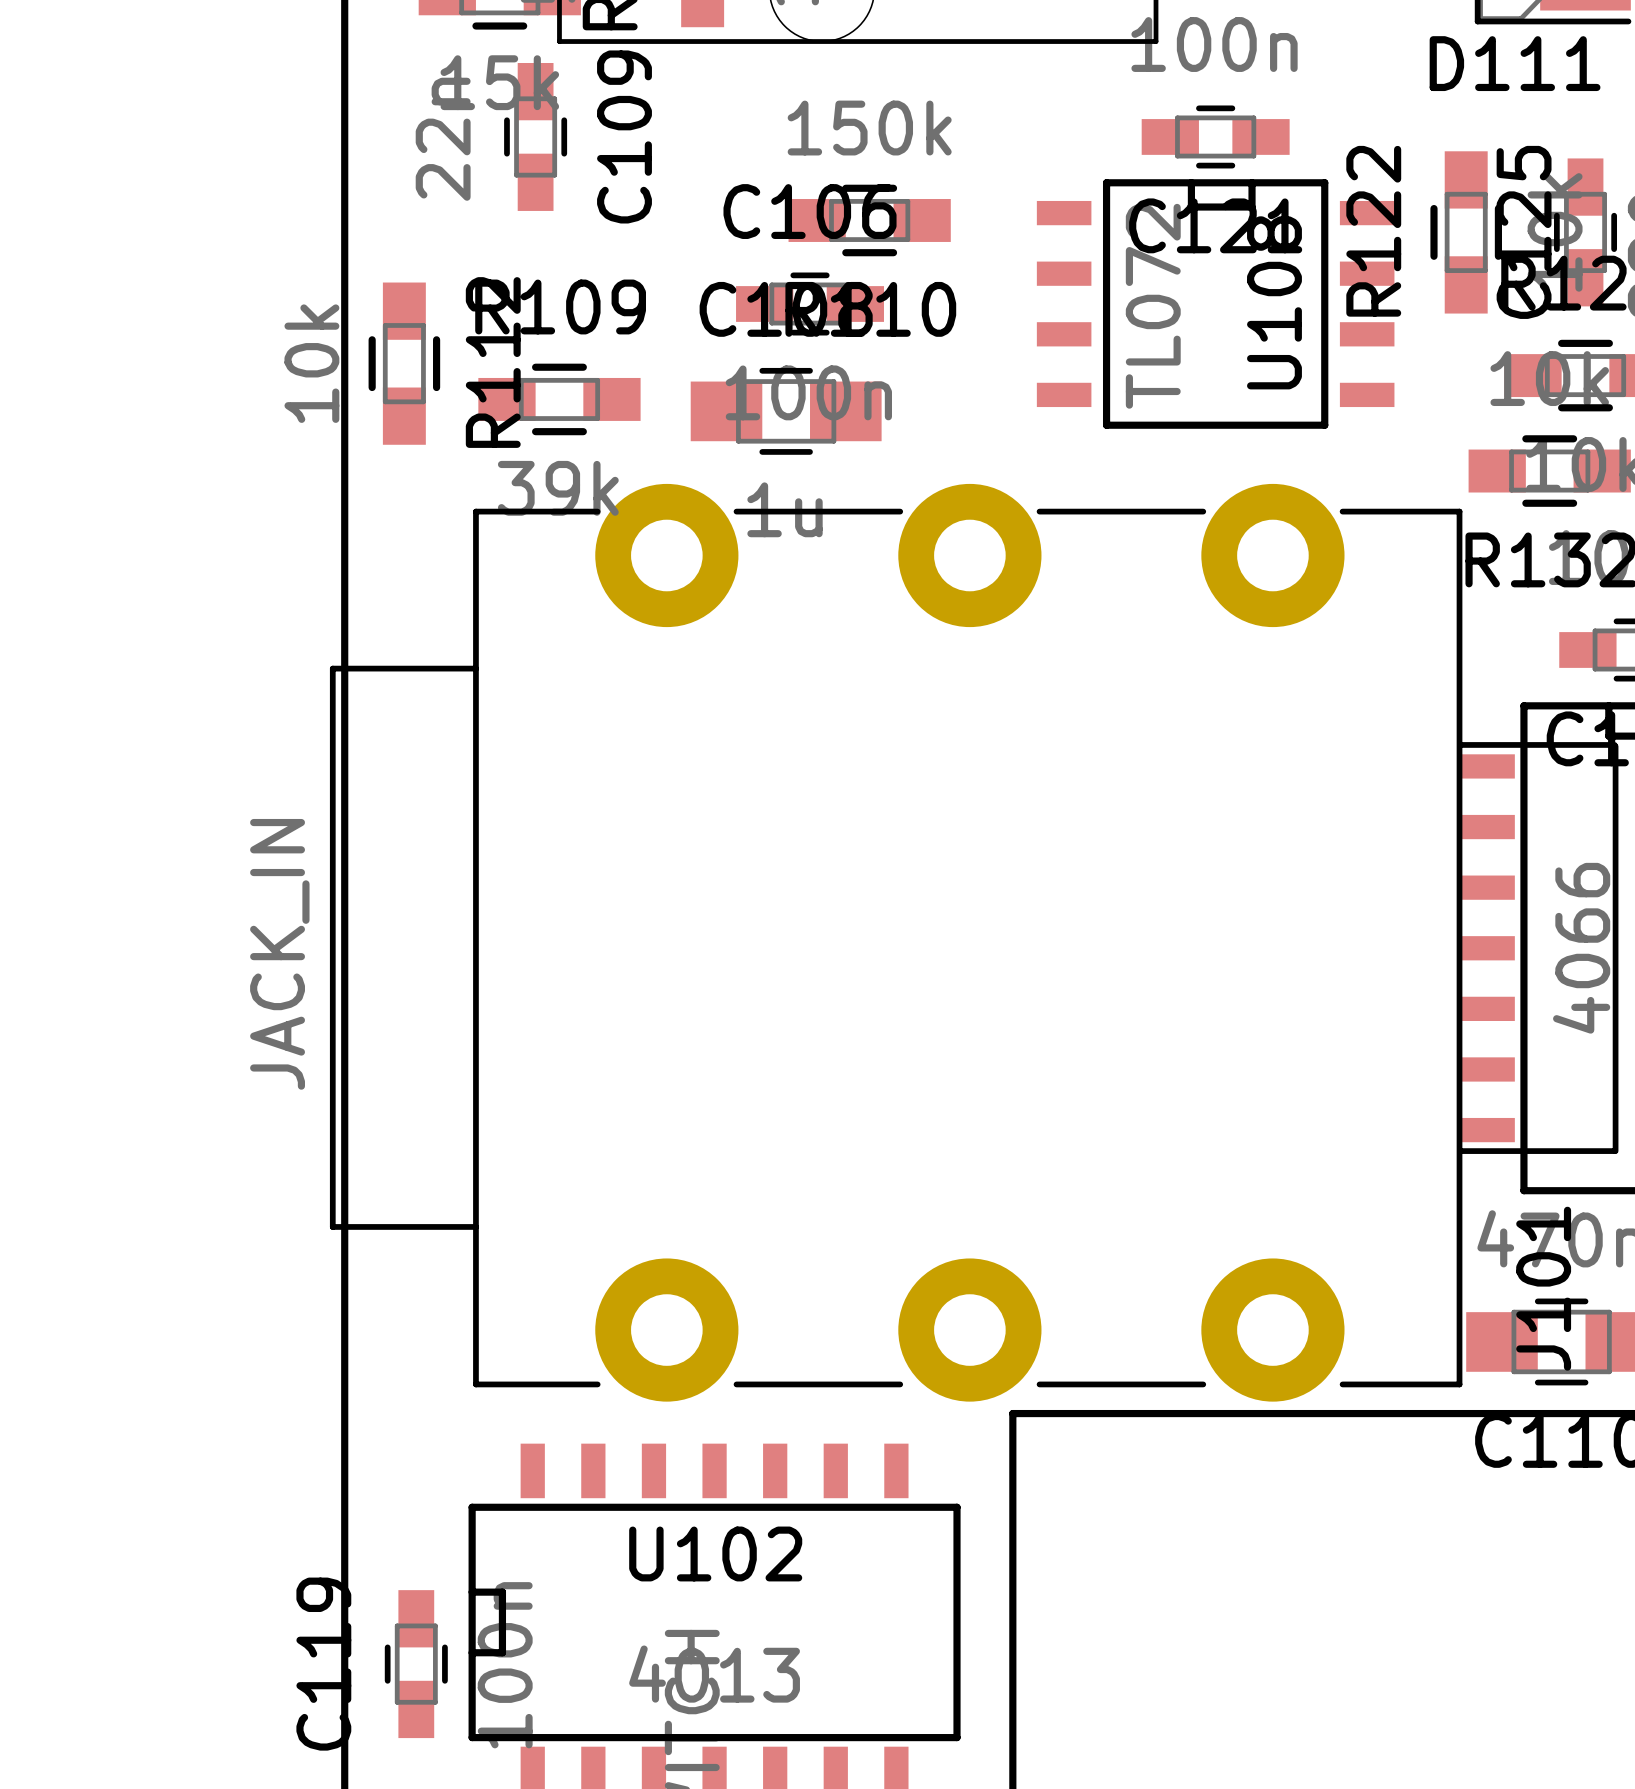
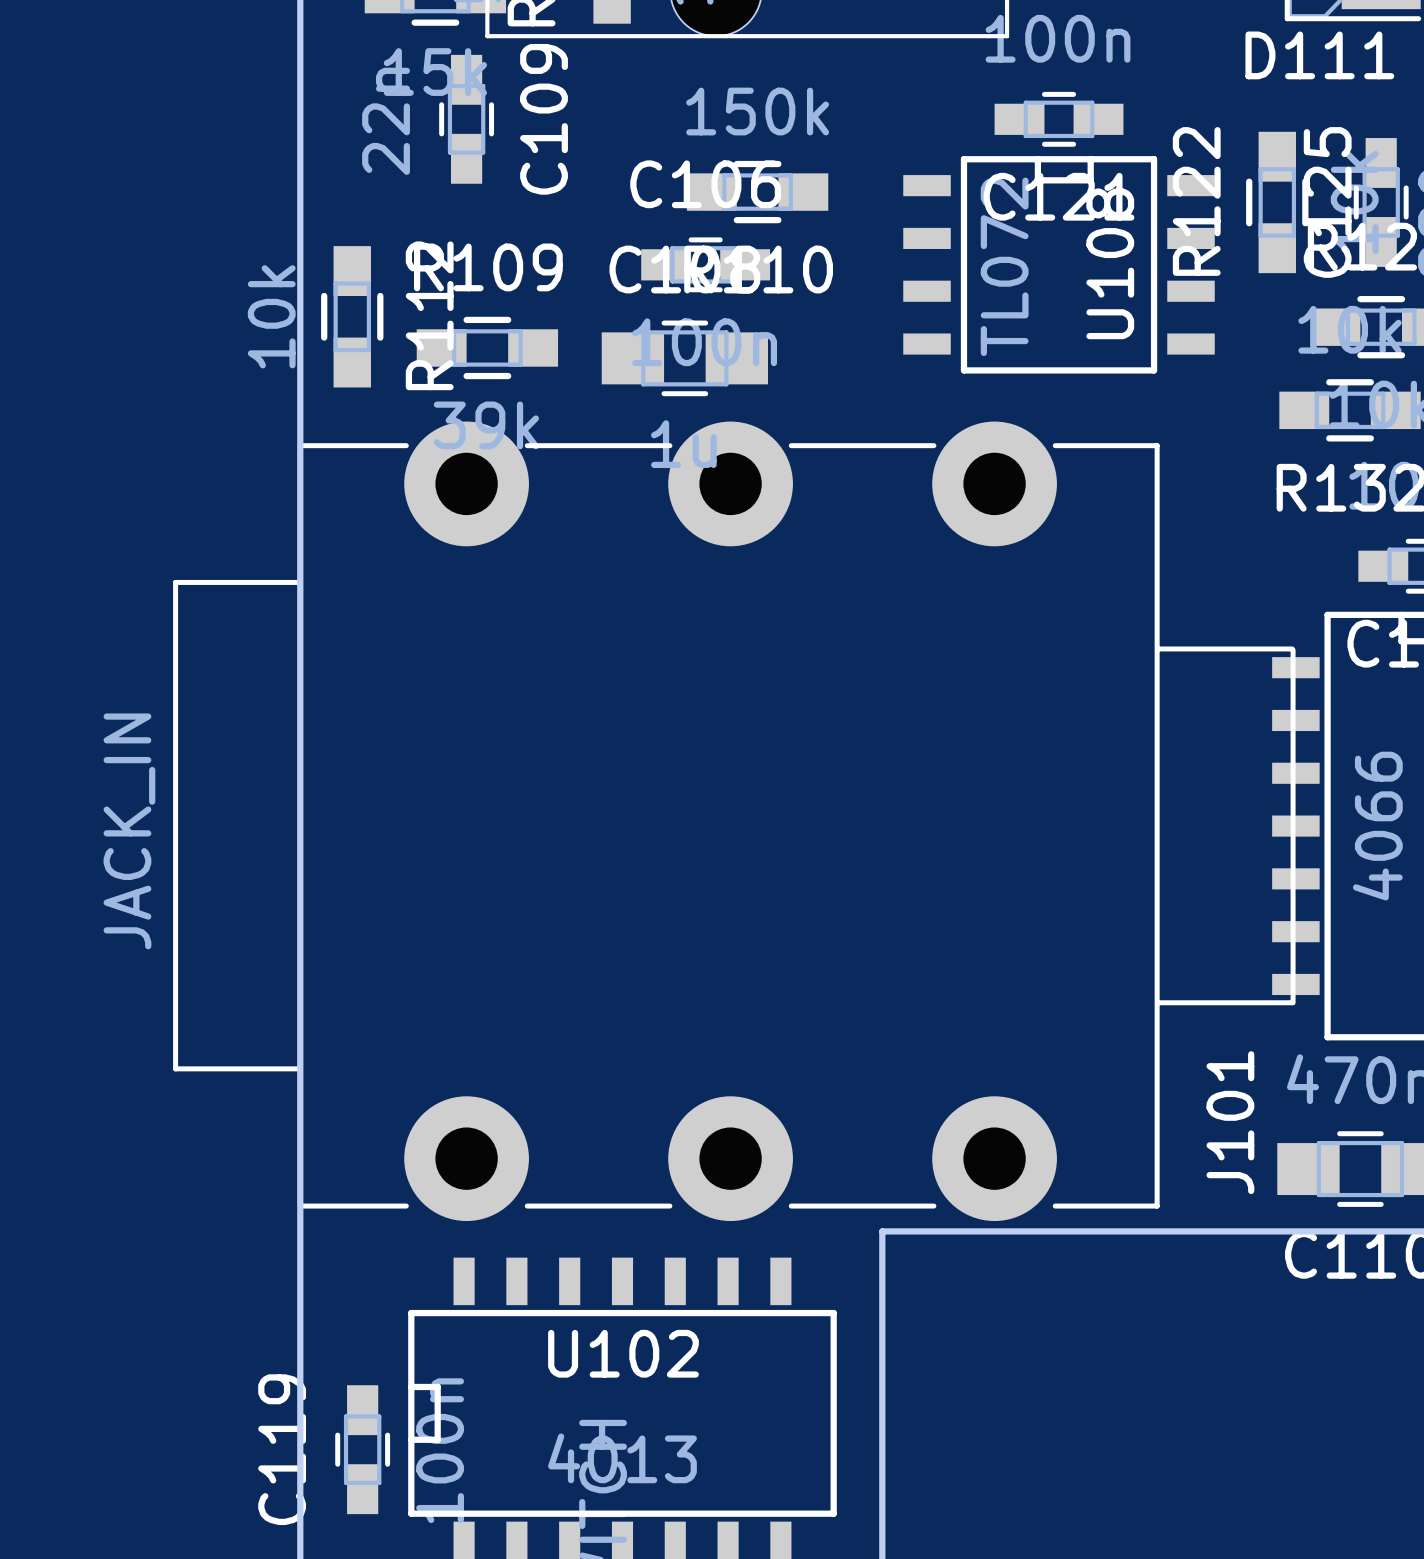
J101 position: (974, 942) -> (734, 821)

